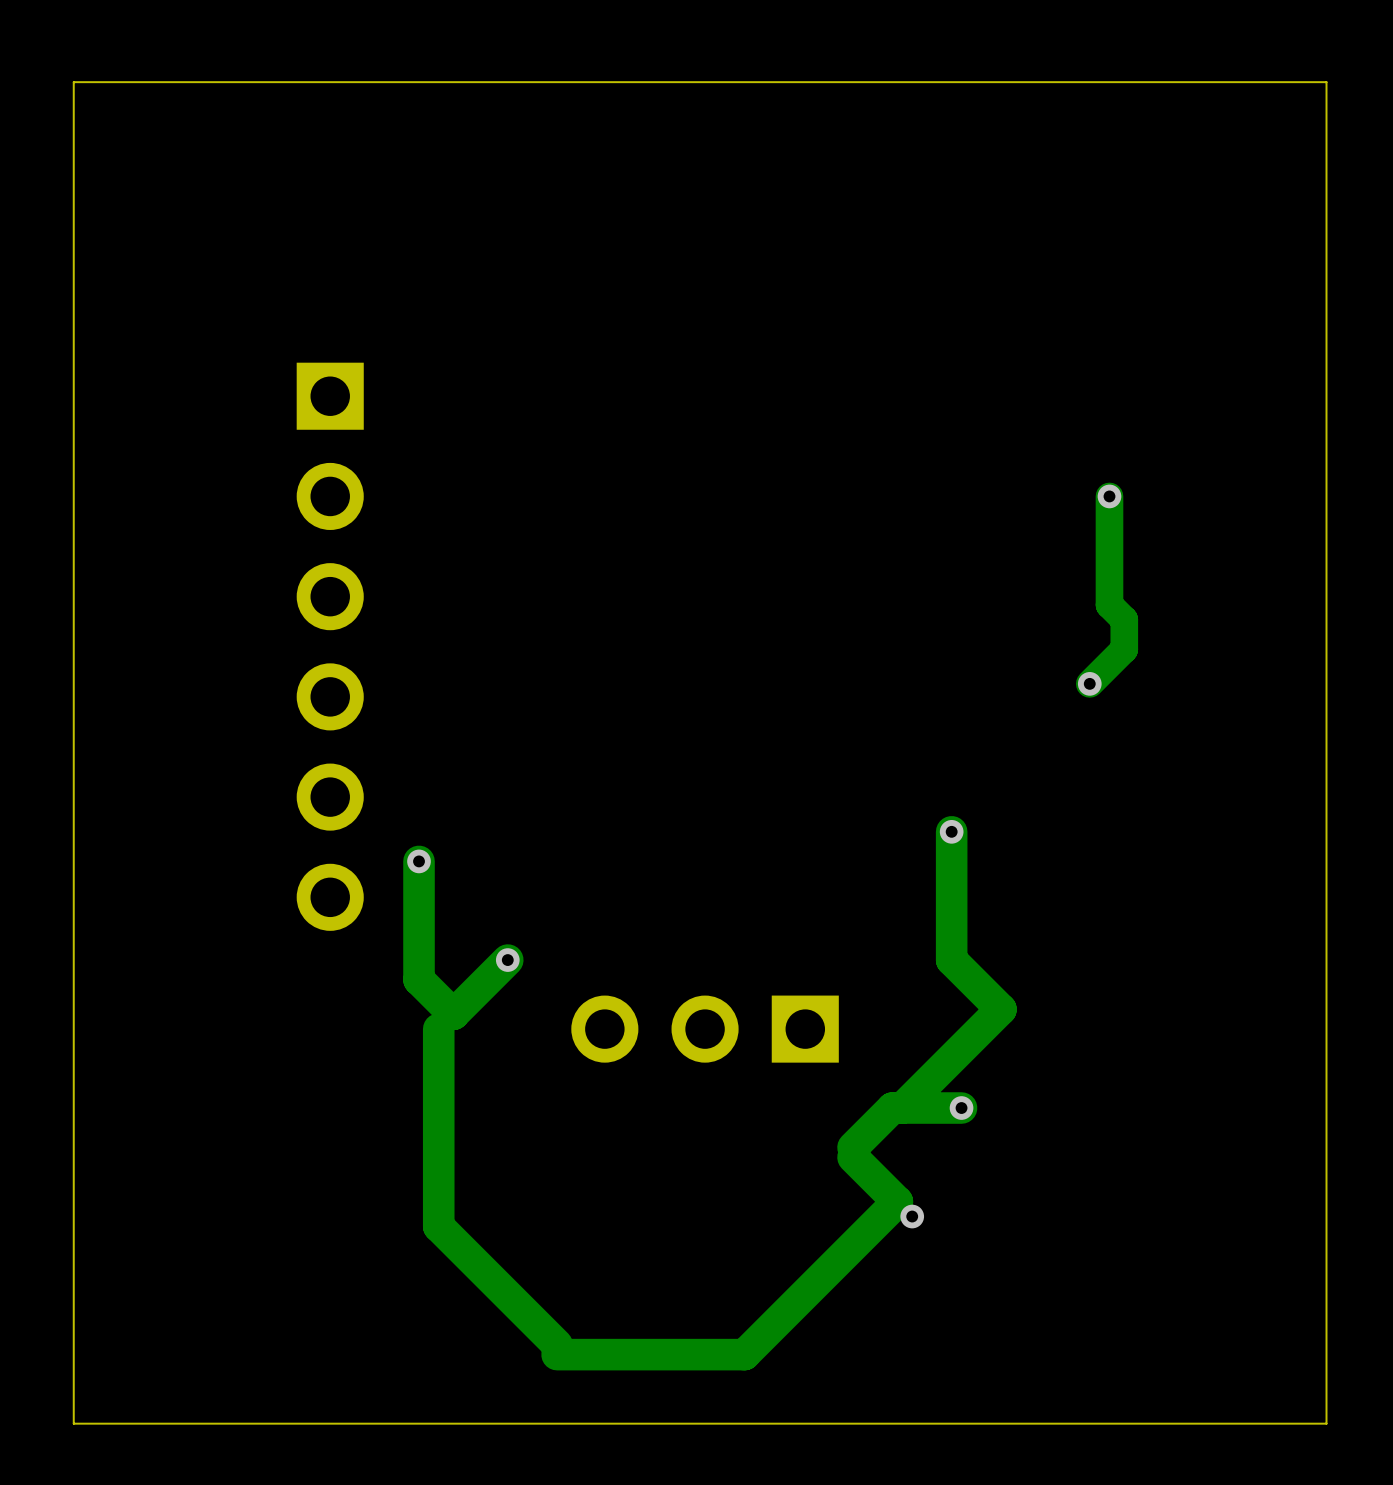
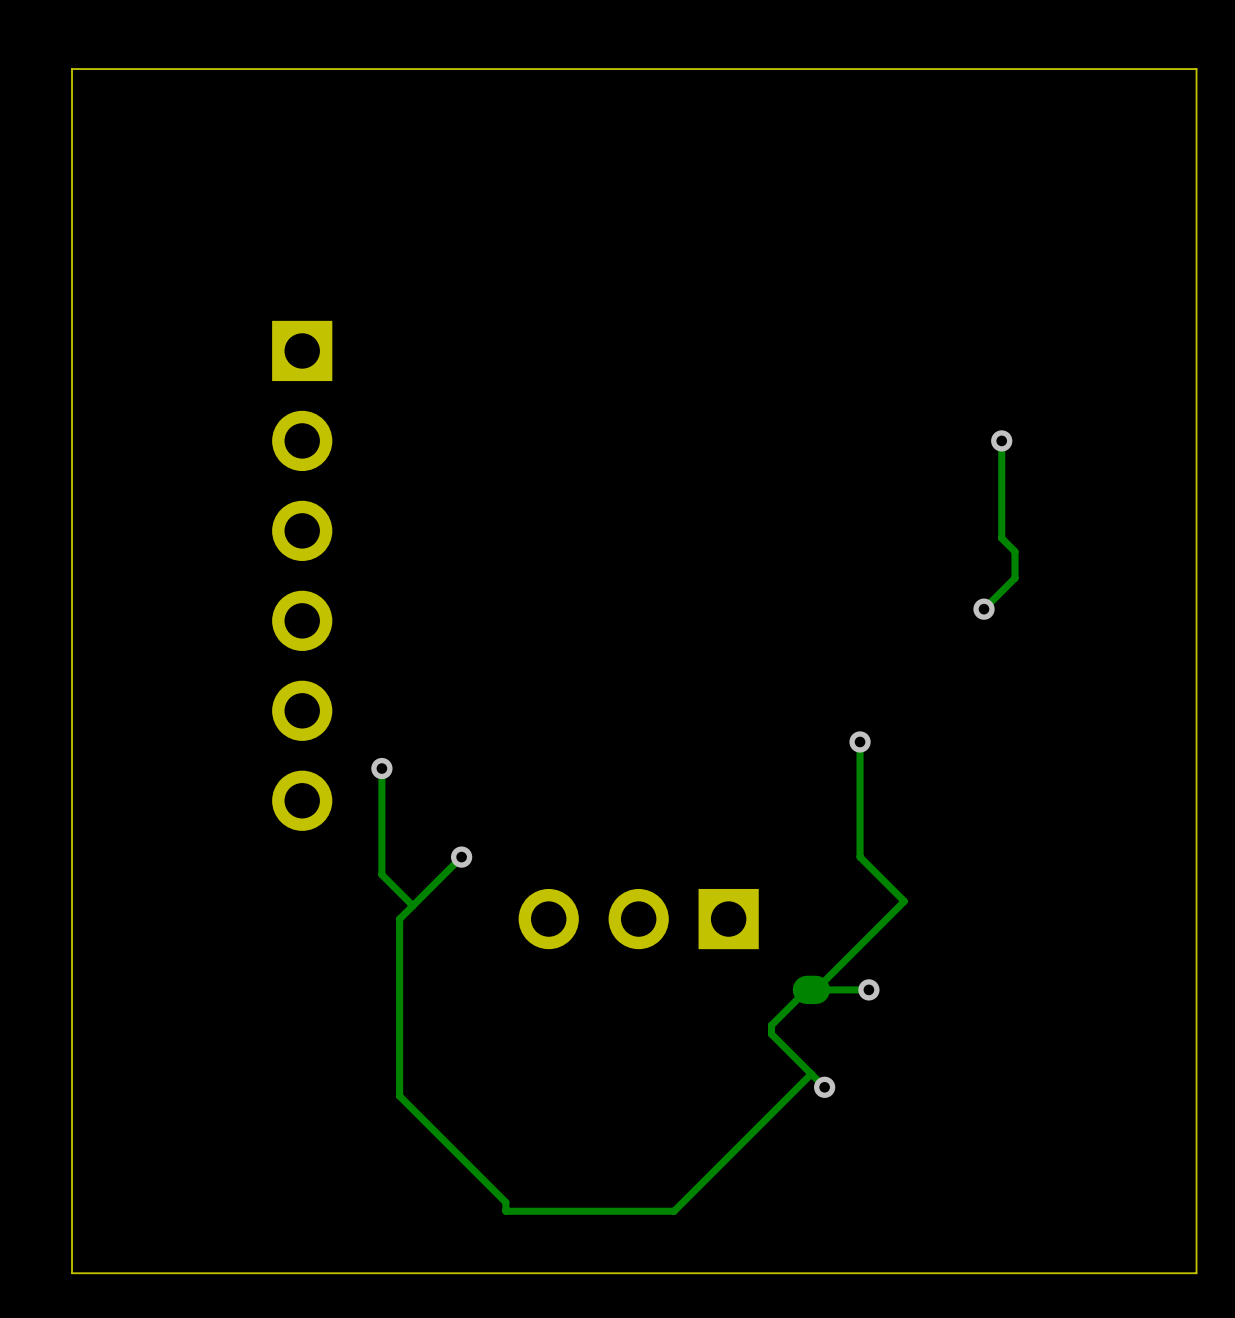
track width: thick (1109, 496) (1109, 604) (1124, 619) (1124, 649) (1089, 683) -> thin (1001, 440) (1001, 538) (1015, 551) (1015, 578) (984, 609)
track width: thick (951, 831) (951, 960) (1000, 1009) (902, 1108) (961, 1108) -> thin (860, 741) (860, 857) (904, 901) (815, 989) (868, 989)
track width: thick (419, 861) (419, 979) (453, 1014) (507, 960) -> thin (381, 768) (381, 874) (412, 905) (461, 857)
track width: thick (438, 1029) (438, 1226) (557, 1344) -> thin (399, 919) (399, 1096) (505, 1202)
track width: thick (892, 1108) (853, 1147) -> thin (806, 989) (771, 1025)
track width: thick (853, 1157) (897, 1201) (744, 1354) (557, 1354) -> thin (771, 1034) (811, 1074) (674, 1211) (505, 1211)

